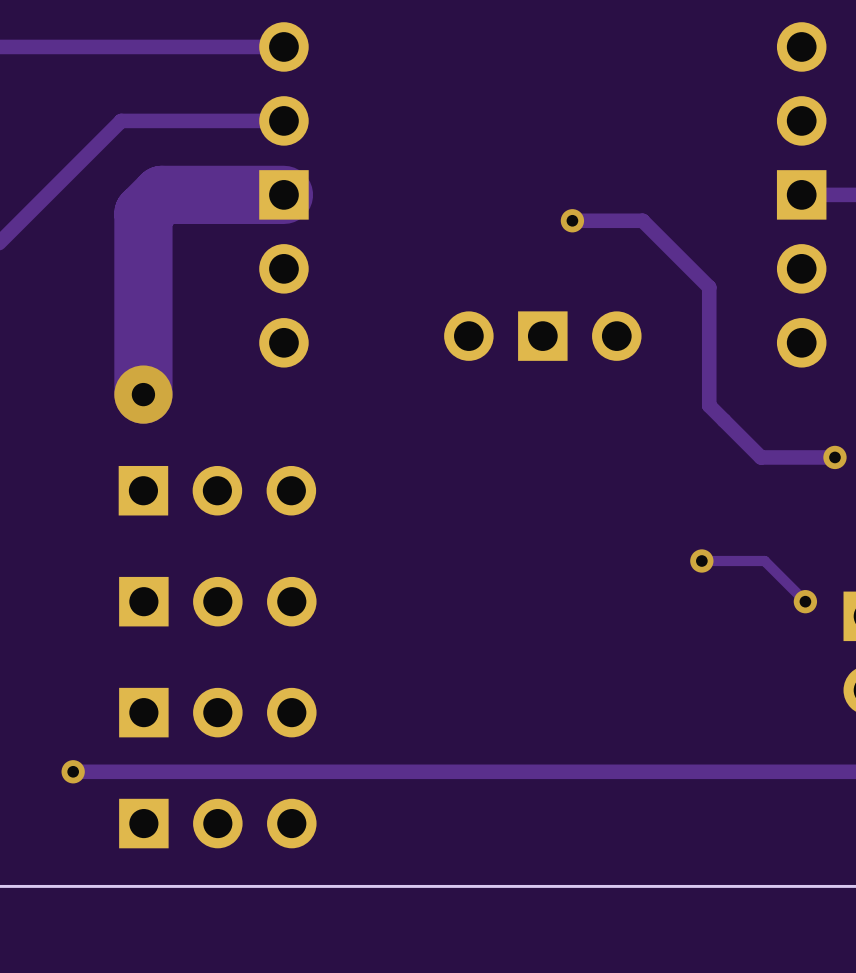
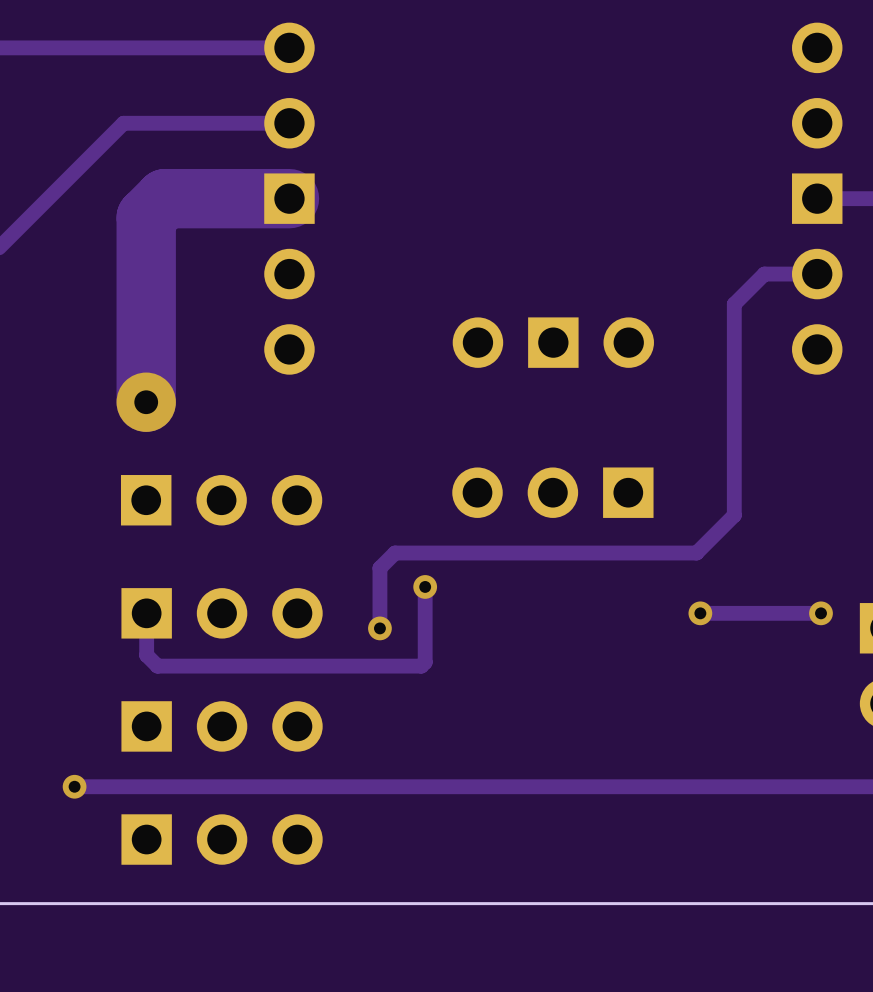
track: (572, 220) (642, 220) (709, 287) (709, 405) (761, 457) (834, 457) -> none
via: (572, 220) -> none
track: none -> (817, 274) (764, 274) (734, 304) (734, 515) (696, 553) (395, 553) (379, 568) (379, 628)
via: (834, 457) -> none
part: none -> (552, 492)
track: (701, 561) (764, 561) (805, 601) -> (700, 613) (821, 613)
via position: (701, 561) -> (700, 613)
track: none -> (425, 586) (425, 662) (421, 666) (157, 666) (146, 655) (146, 613)
via: none -> (425, 586)
via: none -> (379, 628)

